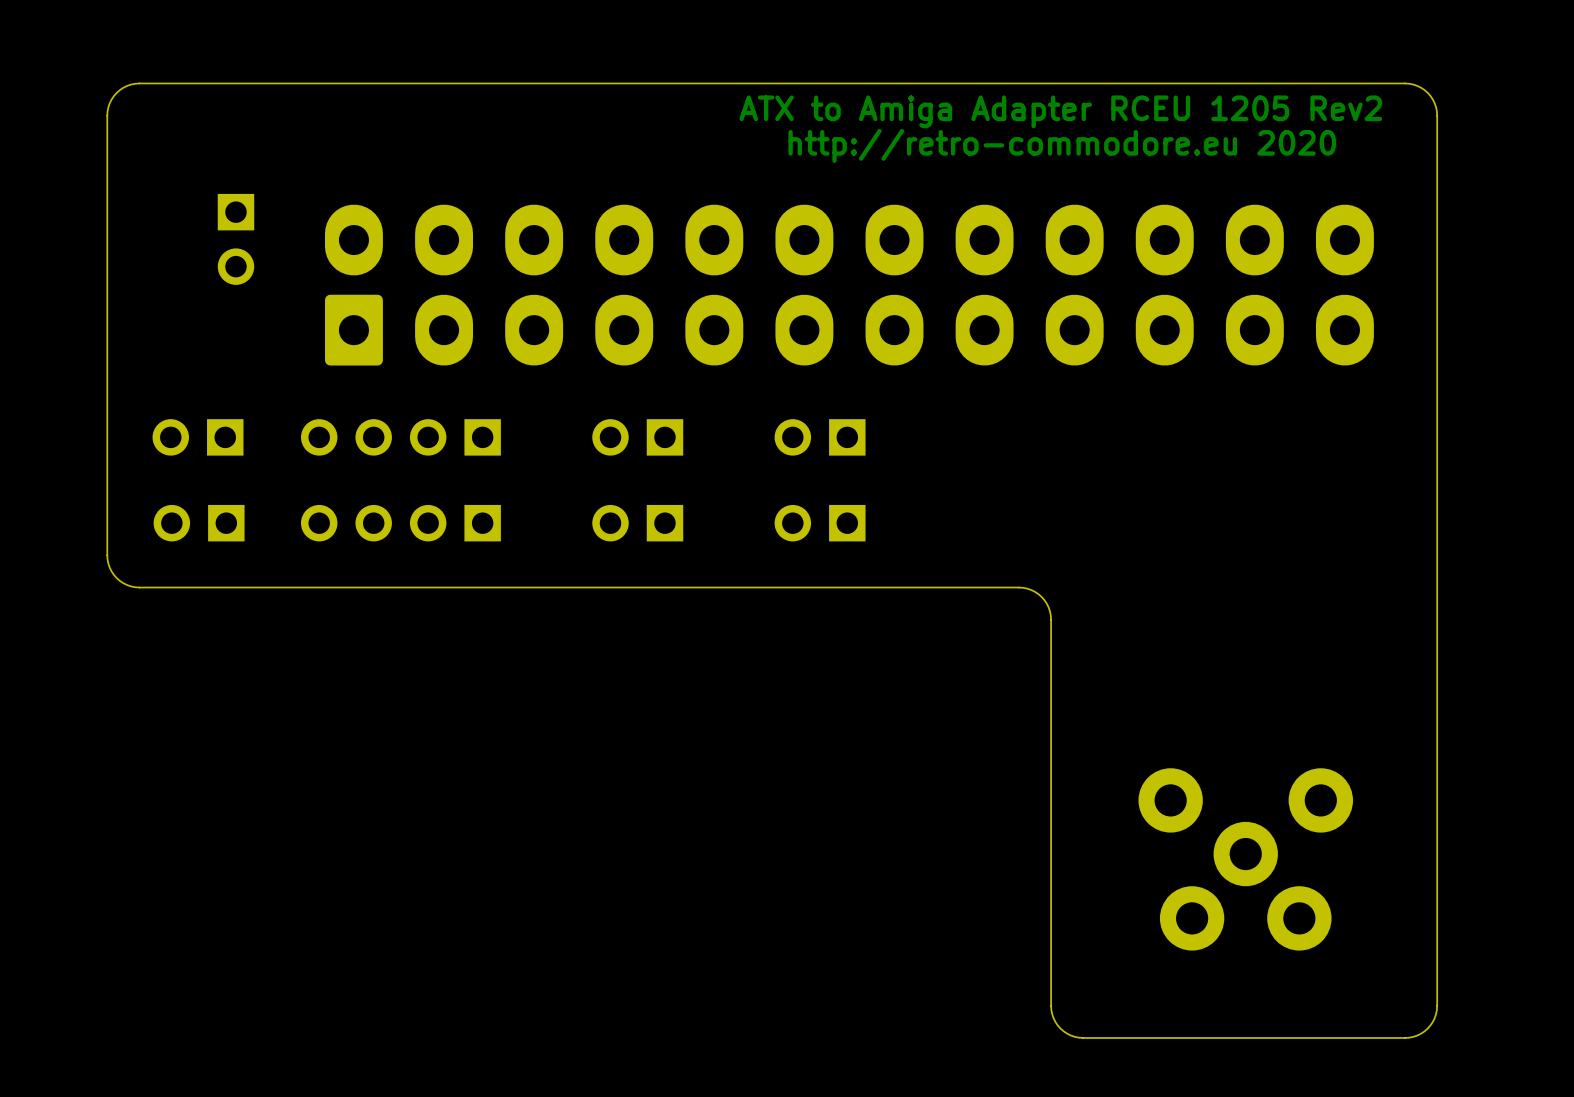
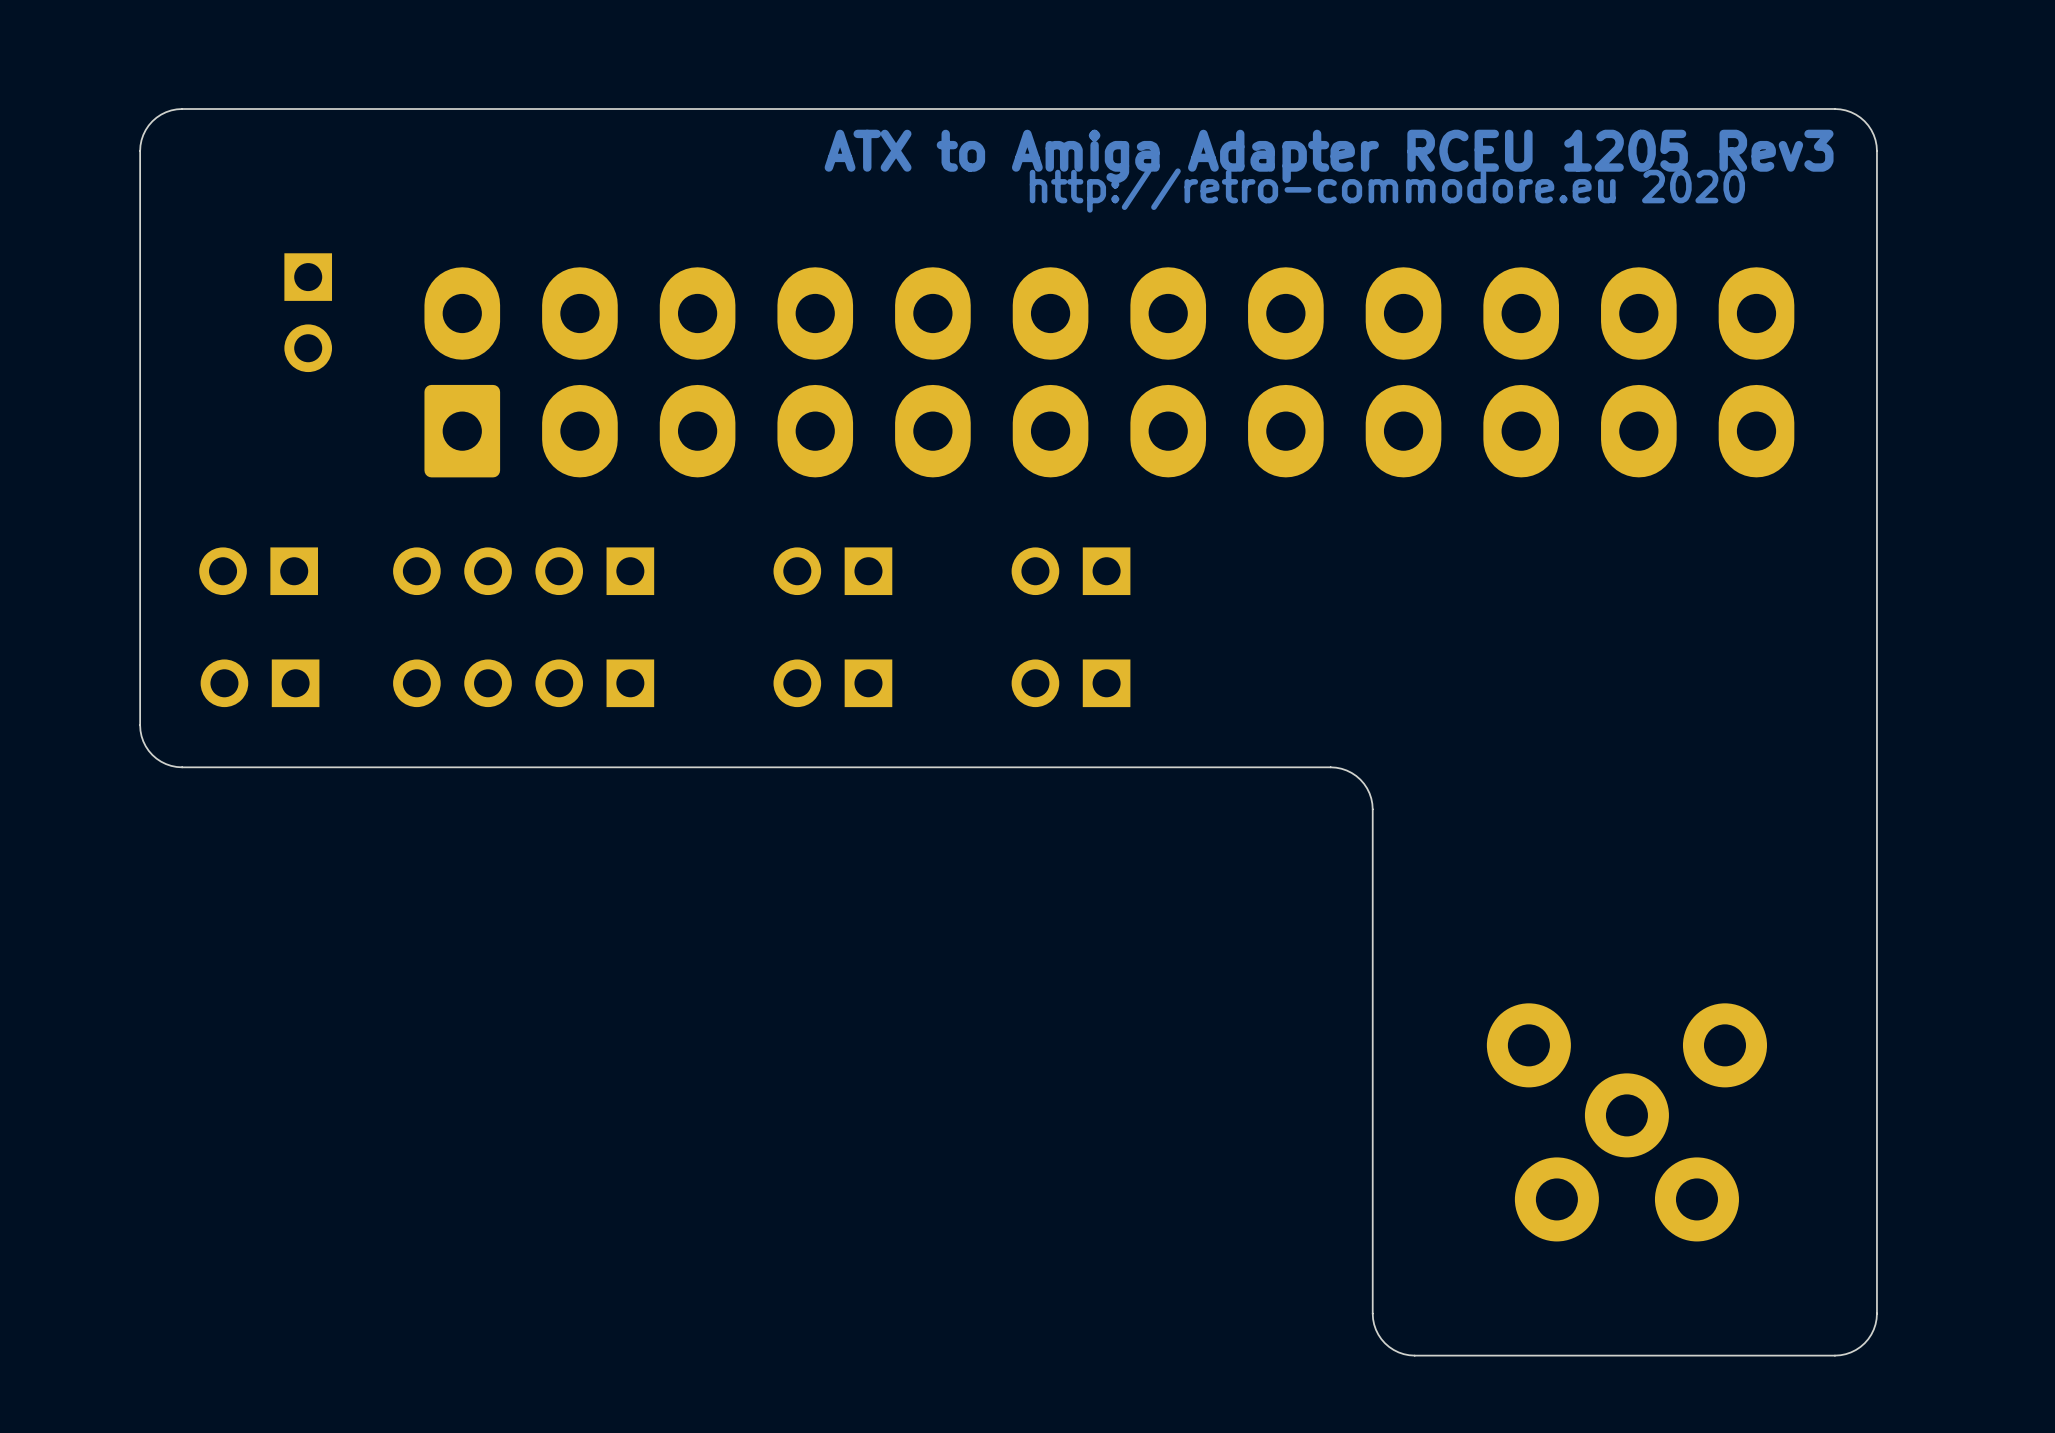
text: ATX to Amiga Adapter RCEU 1205 Rev2 (1060, 111) -> ATX to Amiga Adapter RCEU 1205 Rev3 (1329, 156)

